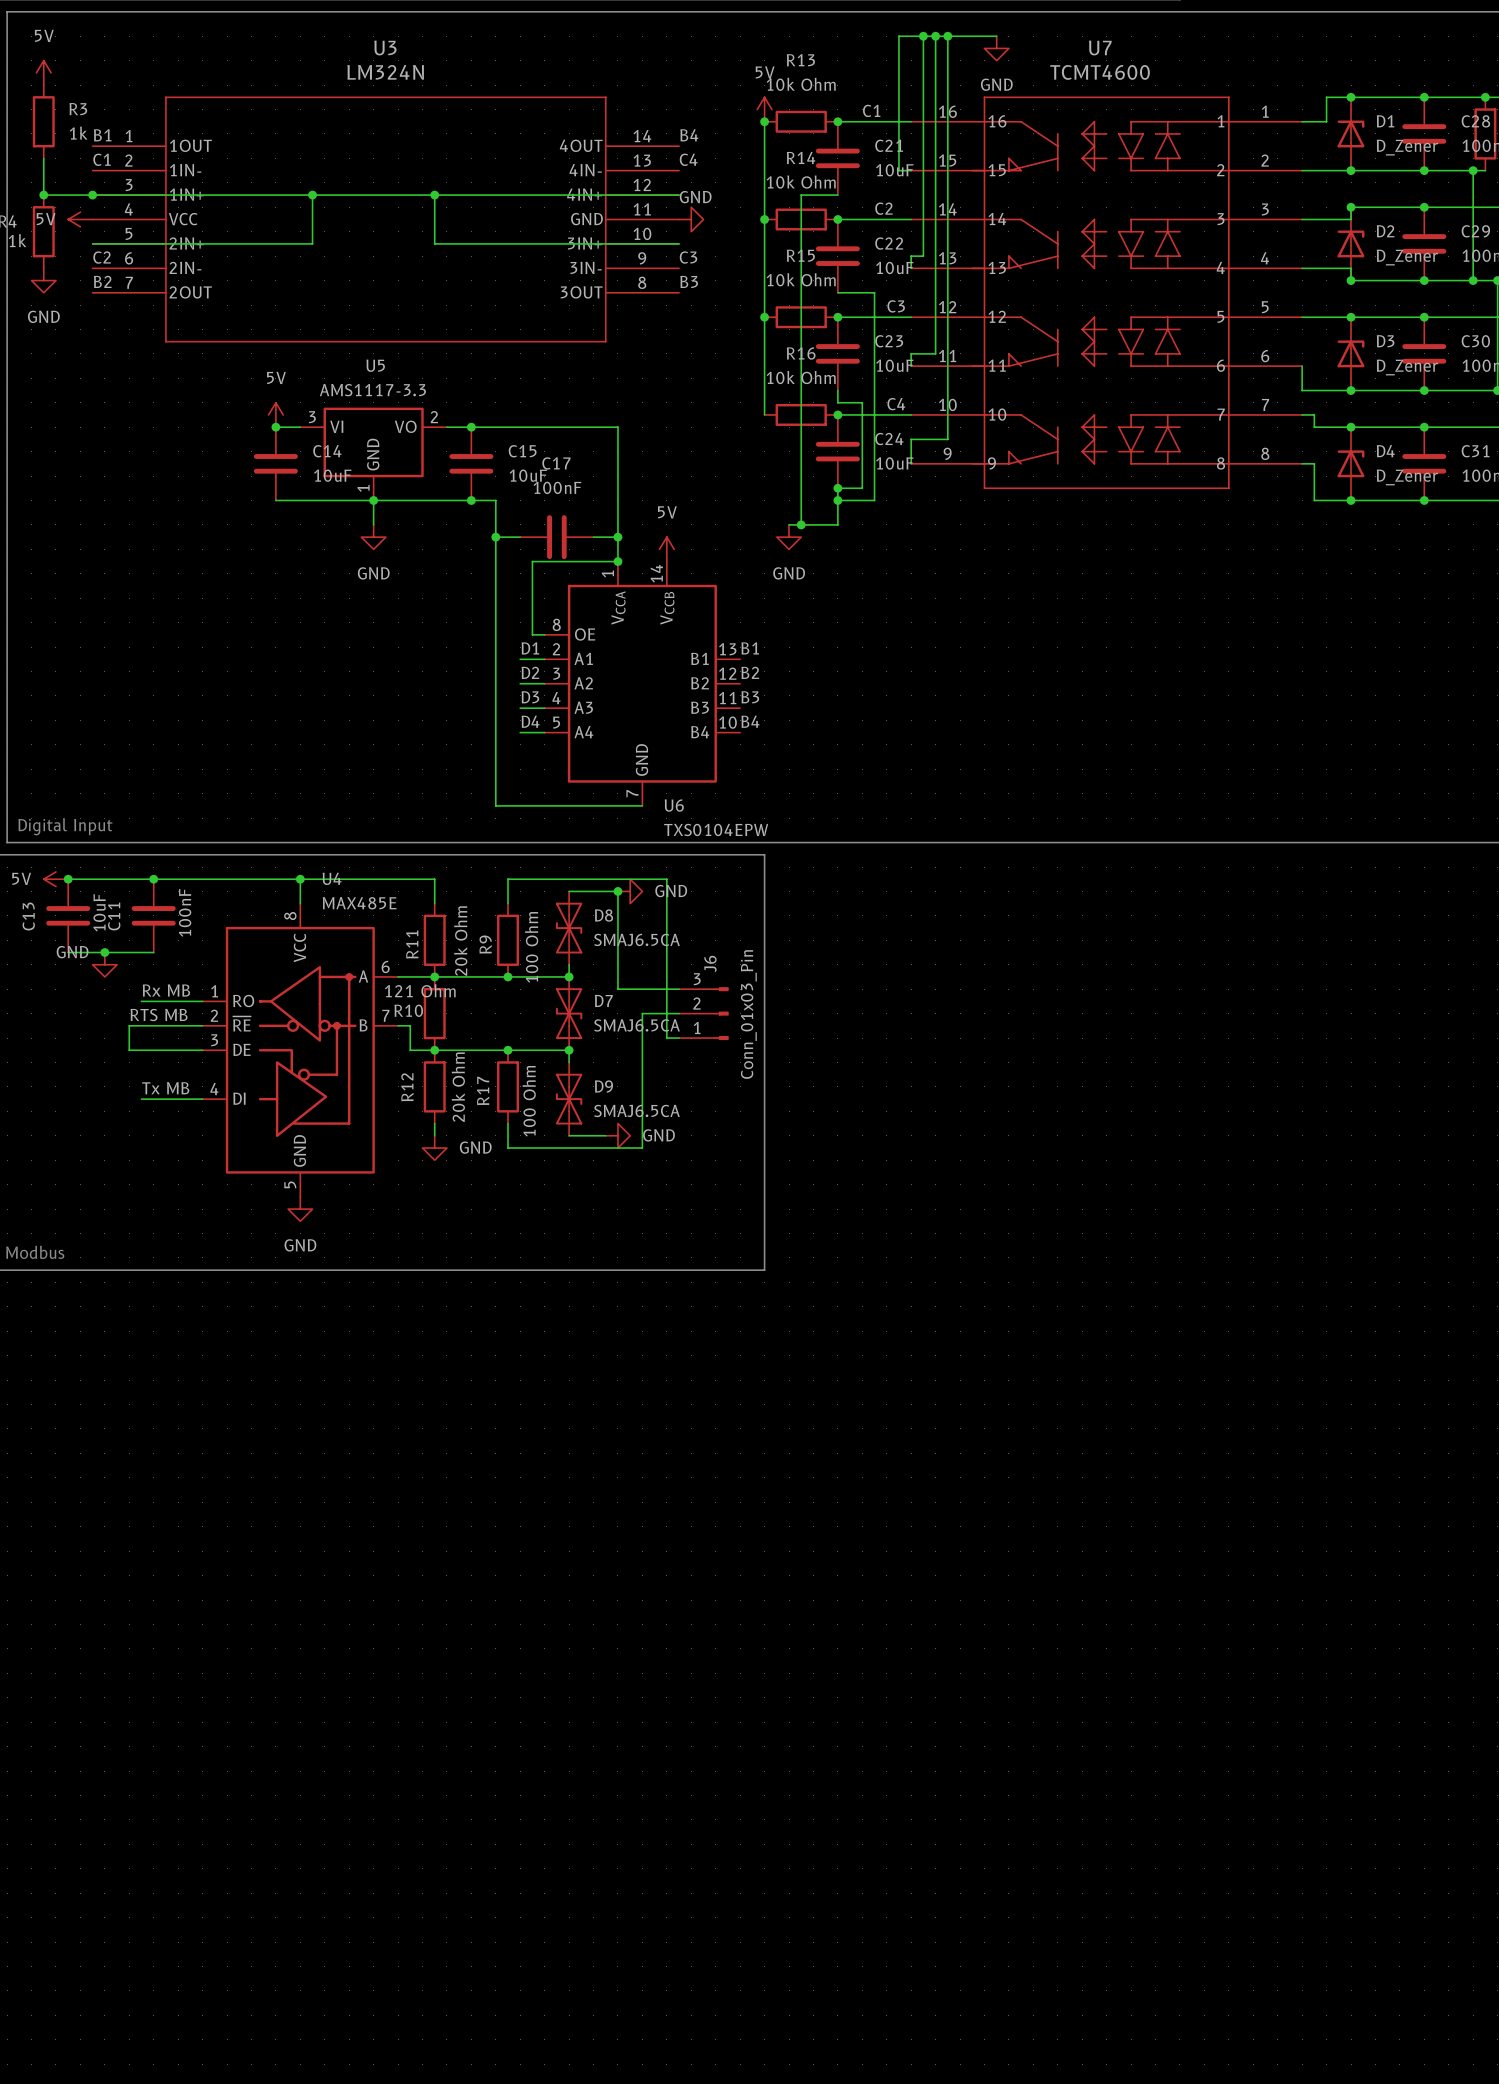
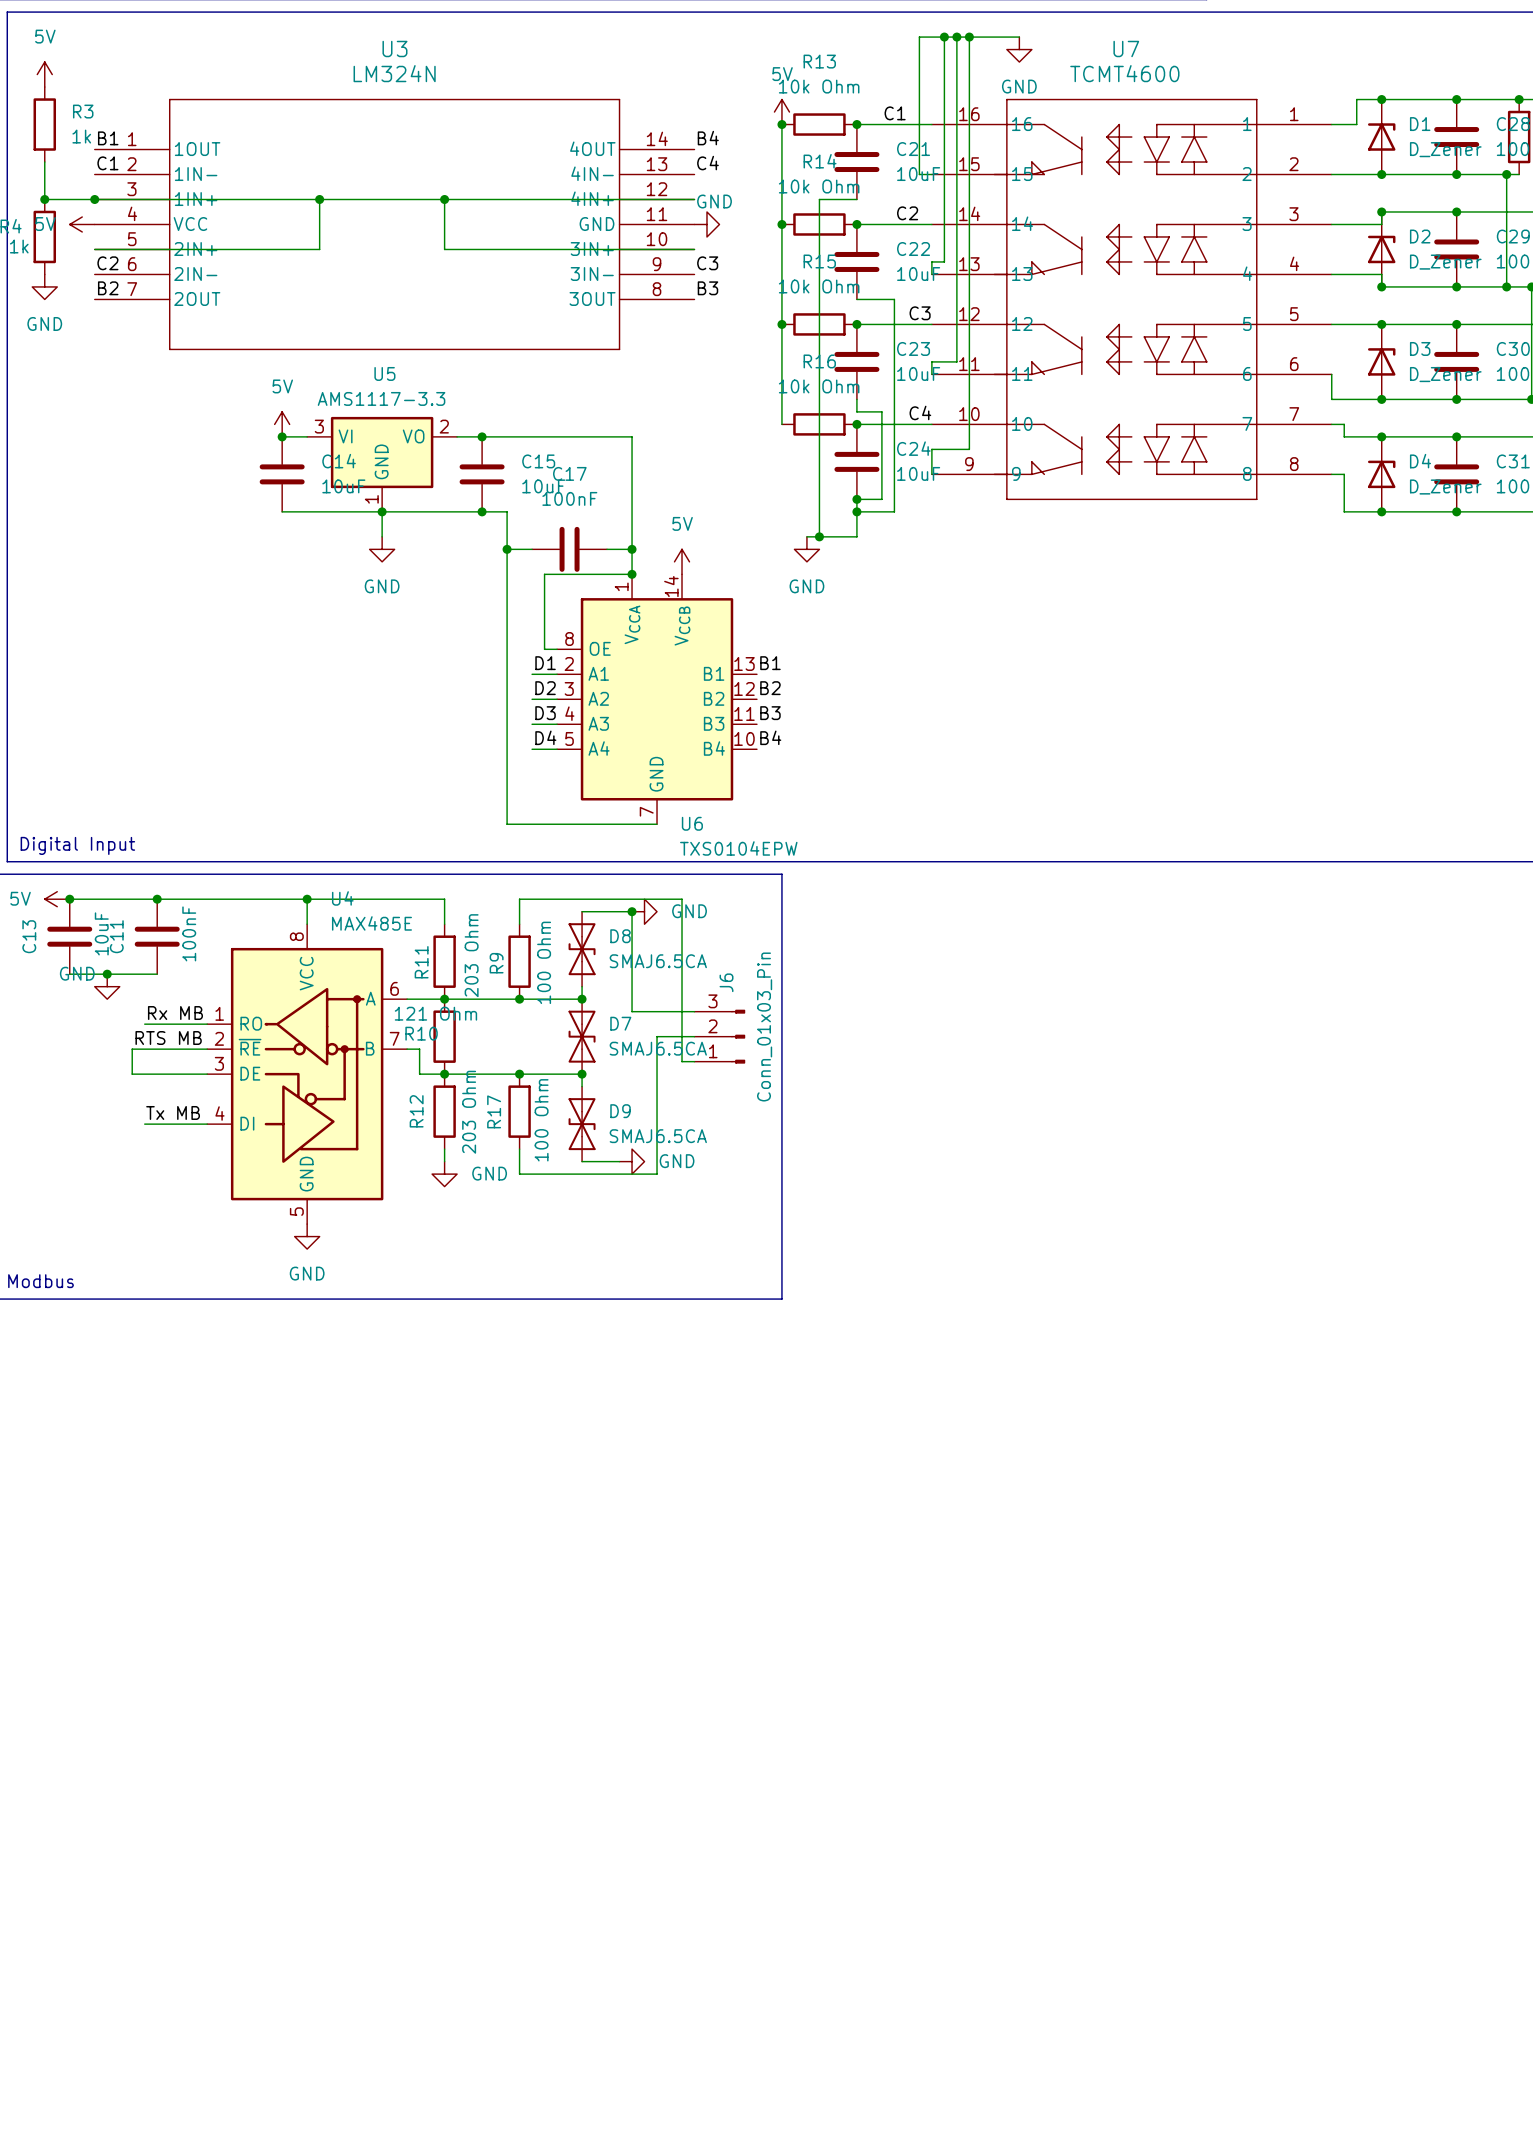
R11 value: 20k Ohm (460, 941) -> 203 Ohm (471, 955)
R12 value: 20k Ohm (458, 1087) -> 203 Ohm (469, 1112)

